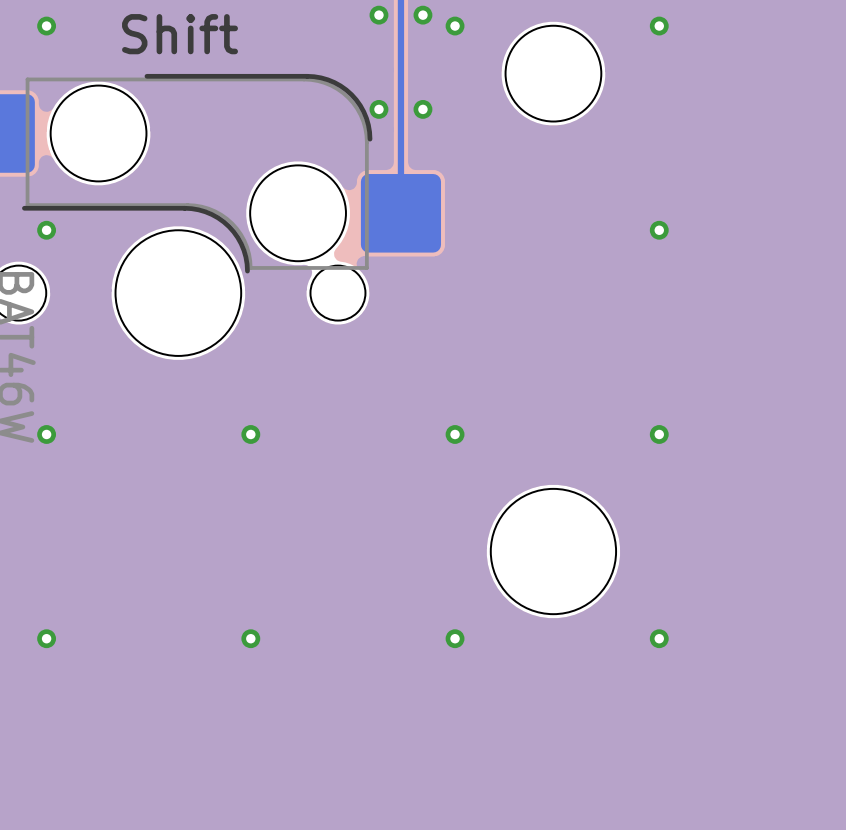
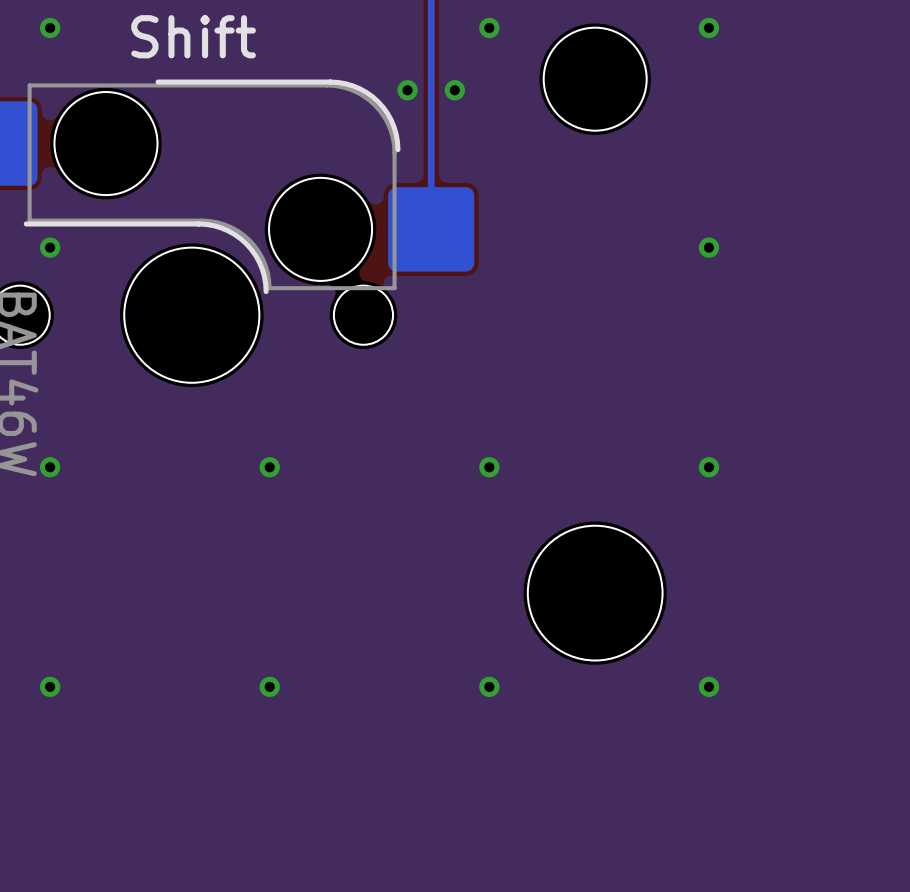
via: (378, 15) -> none
via: (422, 15) -> none
via: none -> (407, 90)
via: none -> (454, 90)
via: (378, 109) -> none
via: (422, 109) -> none

